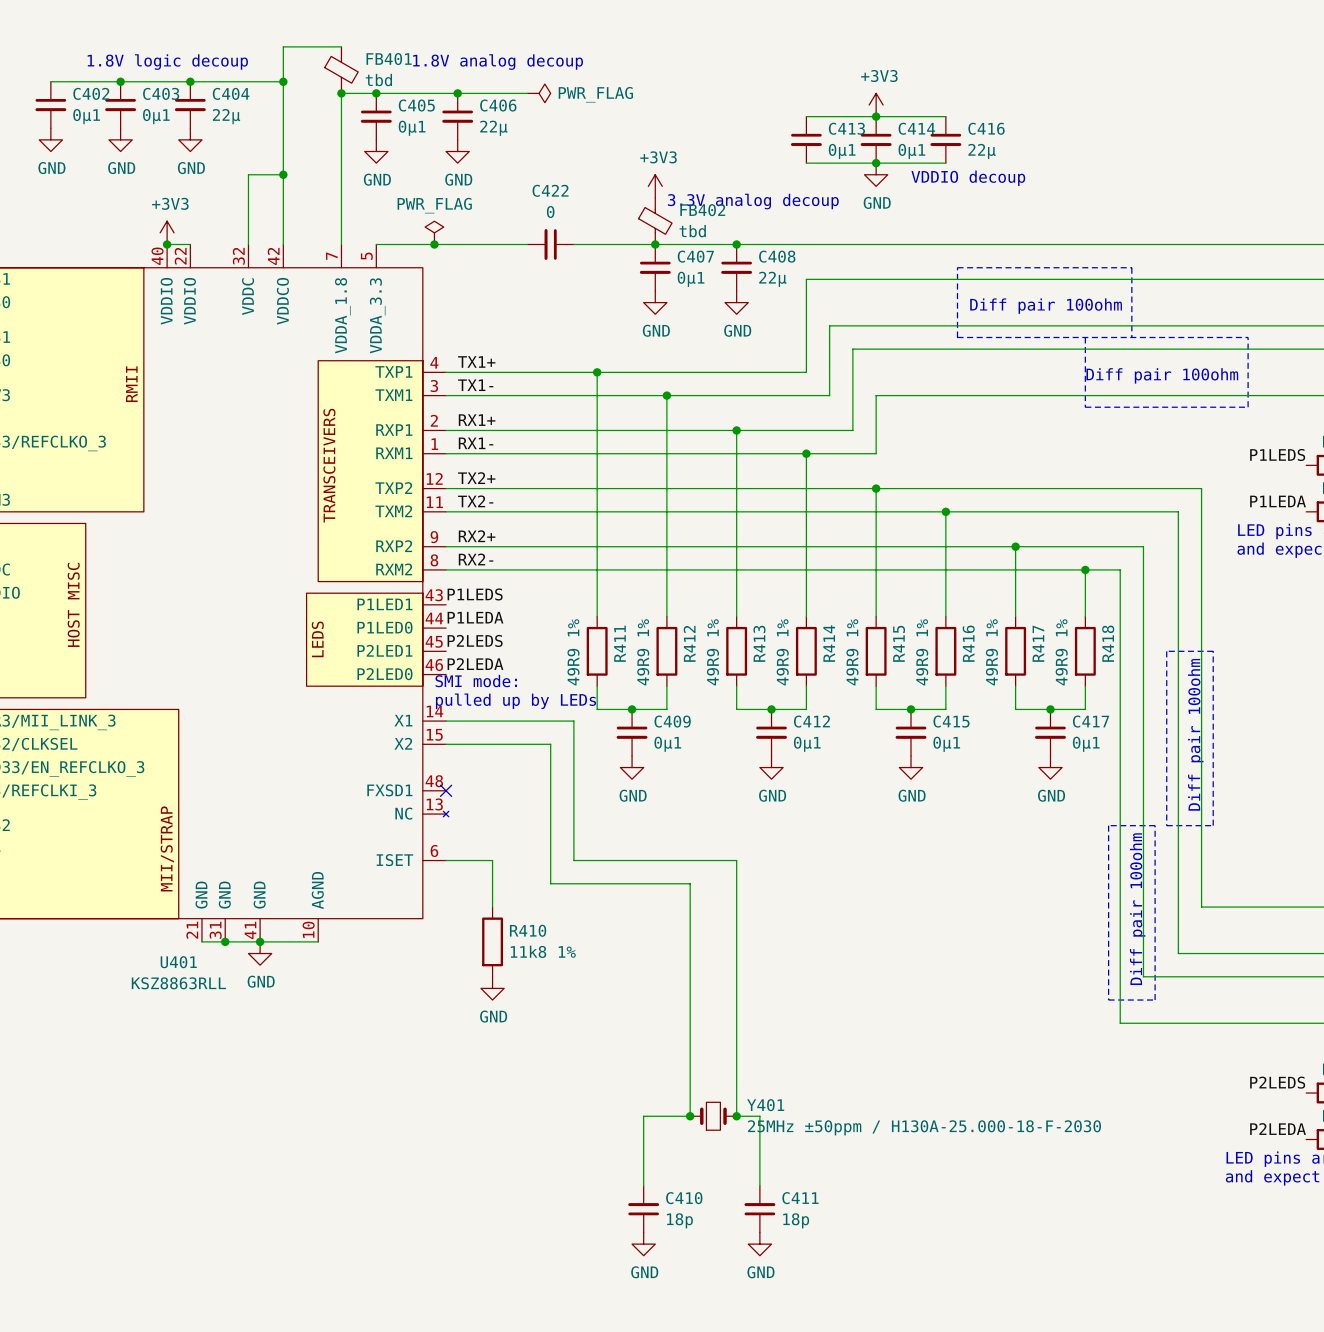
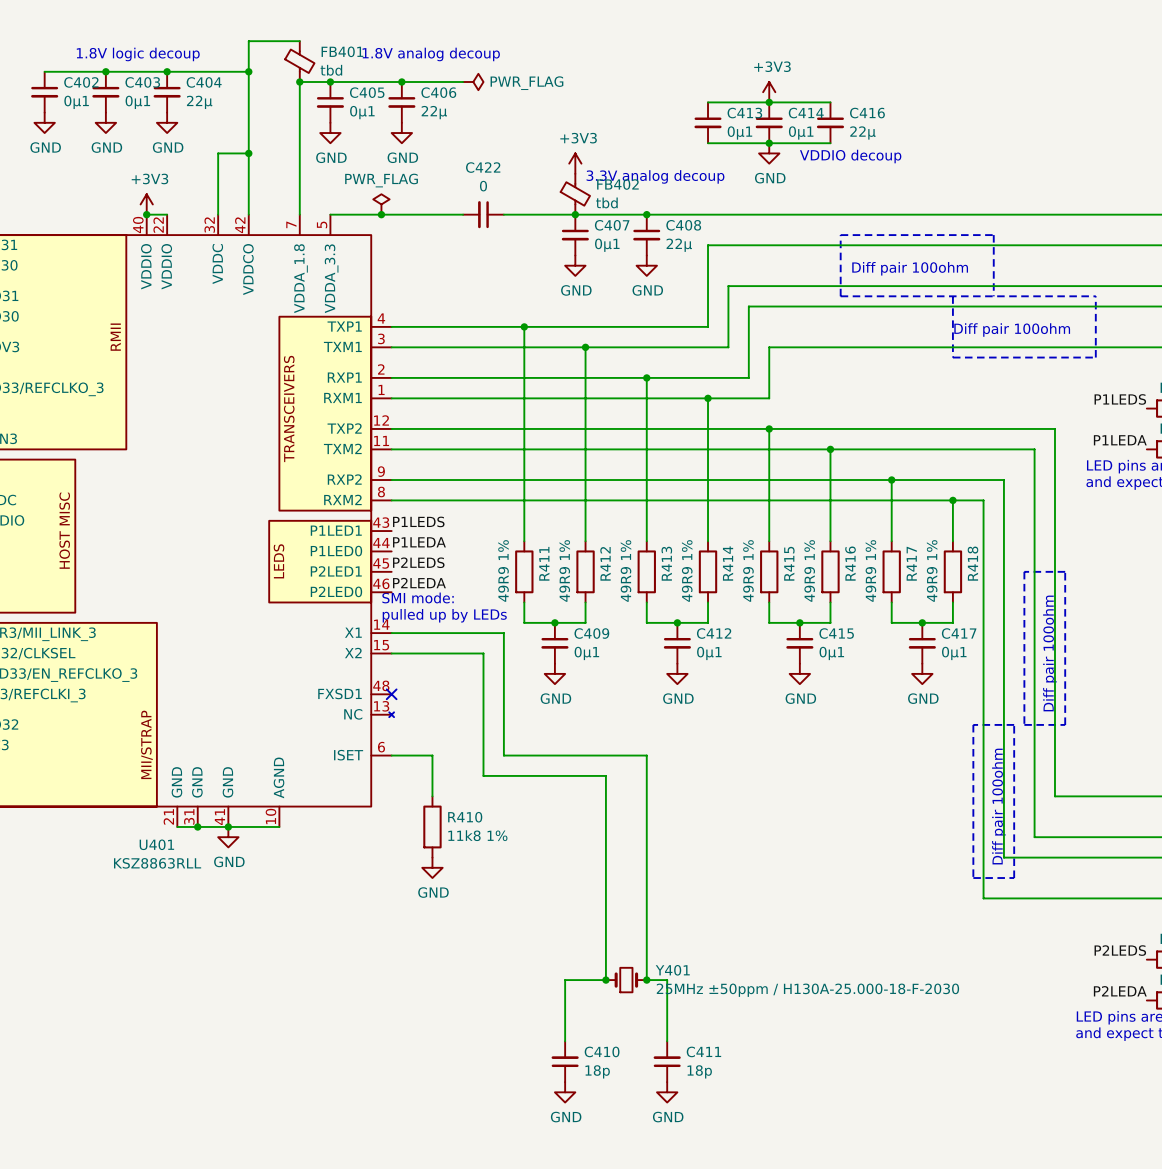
label: TX1+ (476, 361) -> none
label: TX1- (475, 385) -> none
label: RX1+ (477, 420) -> none
label: RX1- (476, 443) -> none
label: TX2+ (476, 478) -> none
label: TX2- (475, 501) -> none
label: RX2+ (477, 536) -> none
label: RX2- (476, 559) -> none

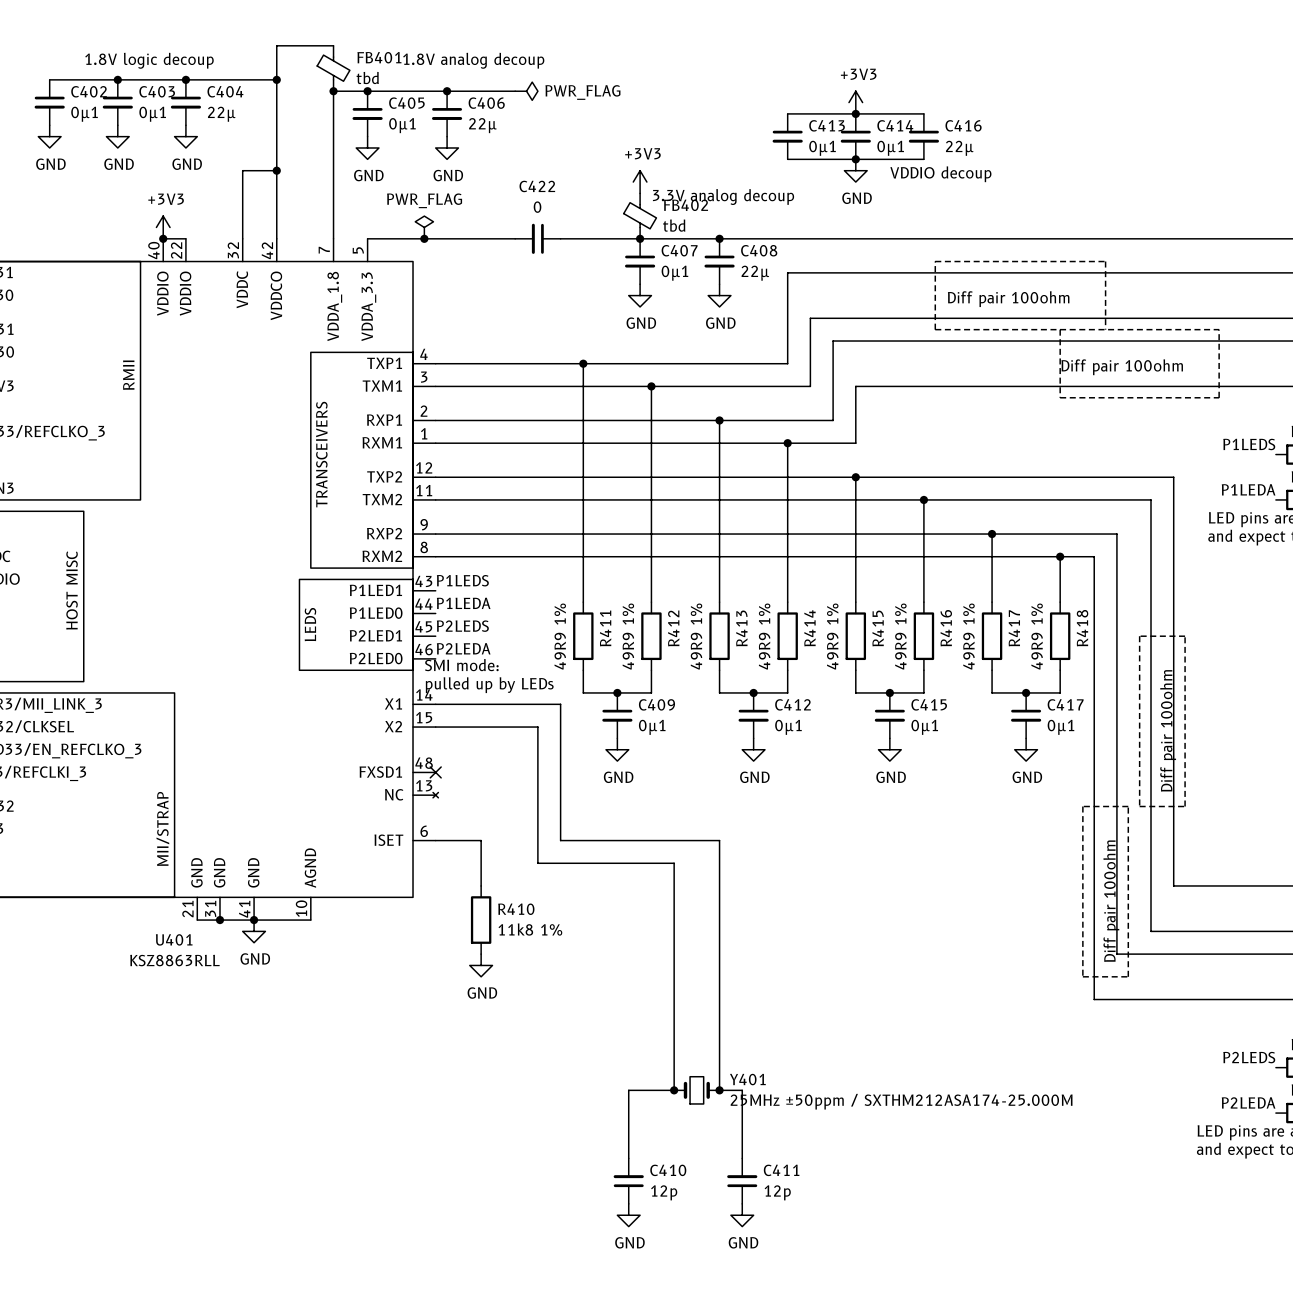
Y401 value: 25MHz ±50ppm / H130A-25.000-18-F-2030 (807, 990) -> 25MHz ±50ppm / SXTHM212ASA174-25.000M (901, 1101)
C410 value: 18p (597, 1071) -> 12p (664, 1192)
C411 value: 18p (699, 1071) -> 12p (777, 1192)

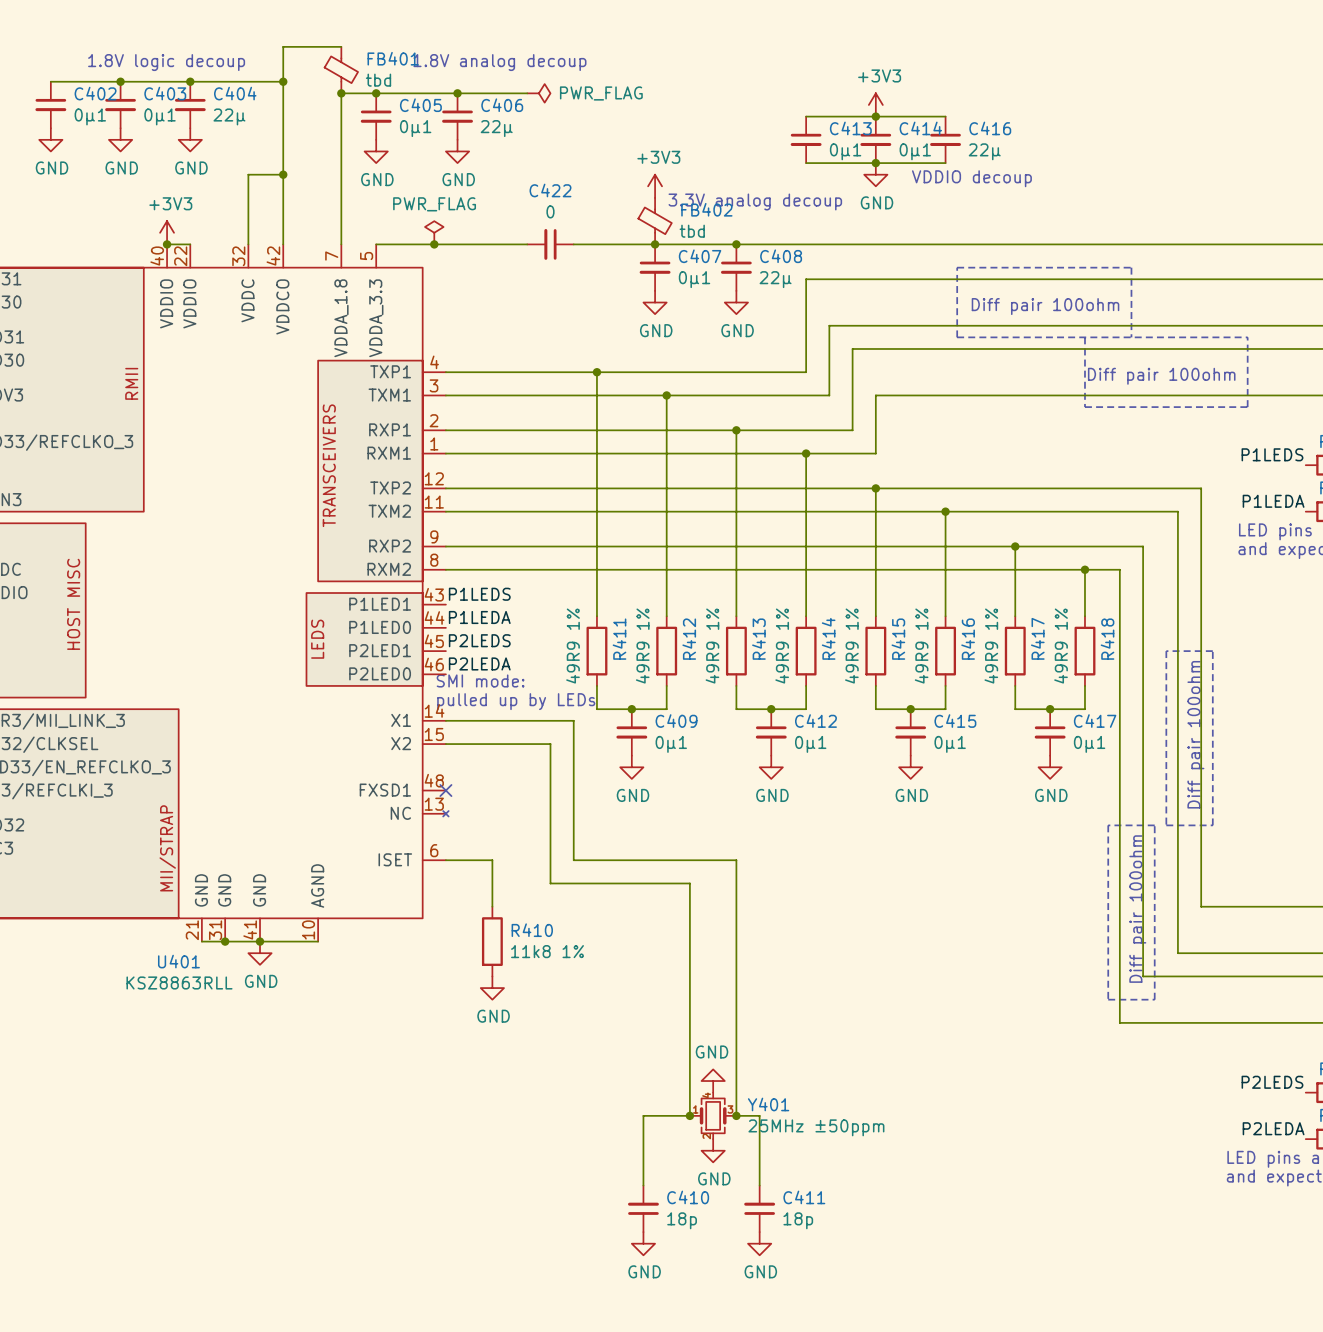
power symbol: none -> GND (713, 1081)
Y401 symbol: [674, 1076, 720, 1104] -> [689, 1092, 737, 1140]
Y401 value: 25MHz ±50ppm / SXTHM212ASA174-25.000M (901, 1101) -> 25MHz ±50ppm (816, 1127)
power symbol: none -> GND (713, 1150)
C410 value: 12p (664, 1192) -> 18p (682, 1220)
C411 value: 12p (777, 1192) -> 18p (798, 1220)

